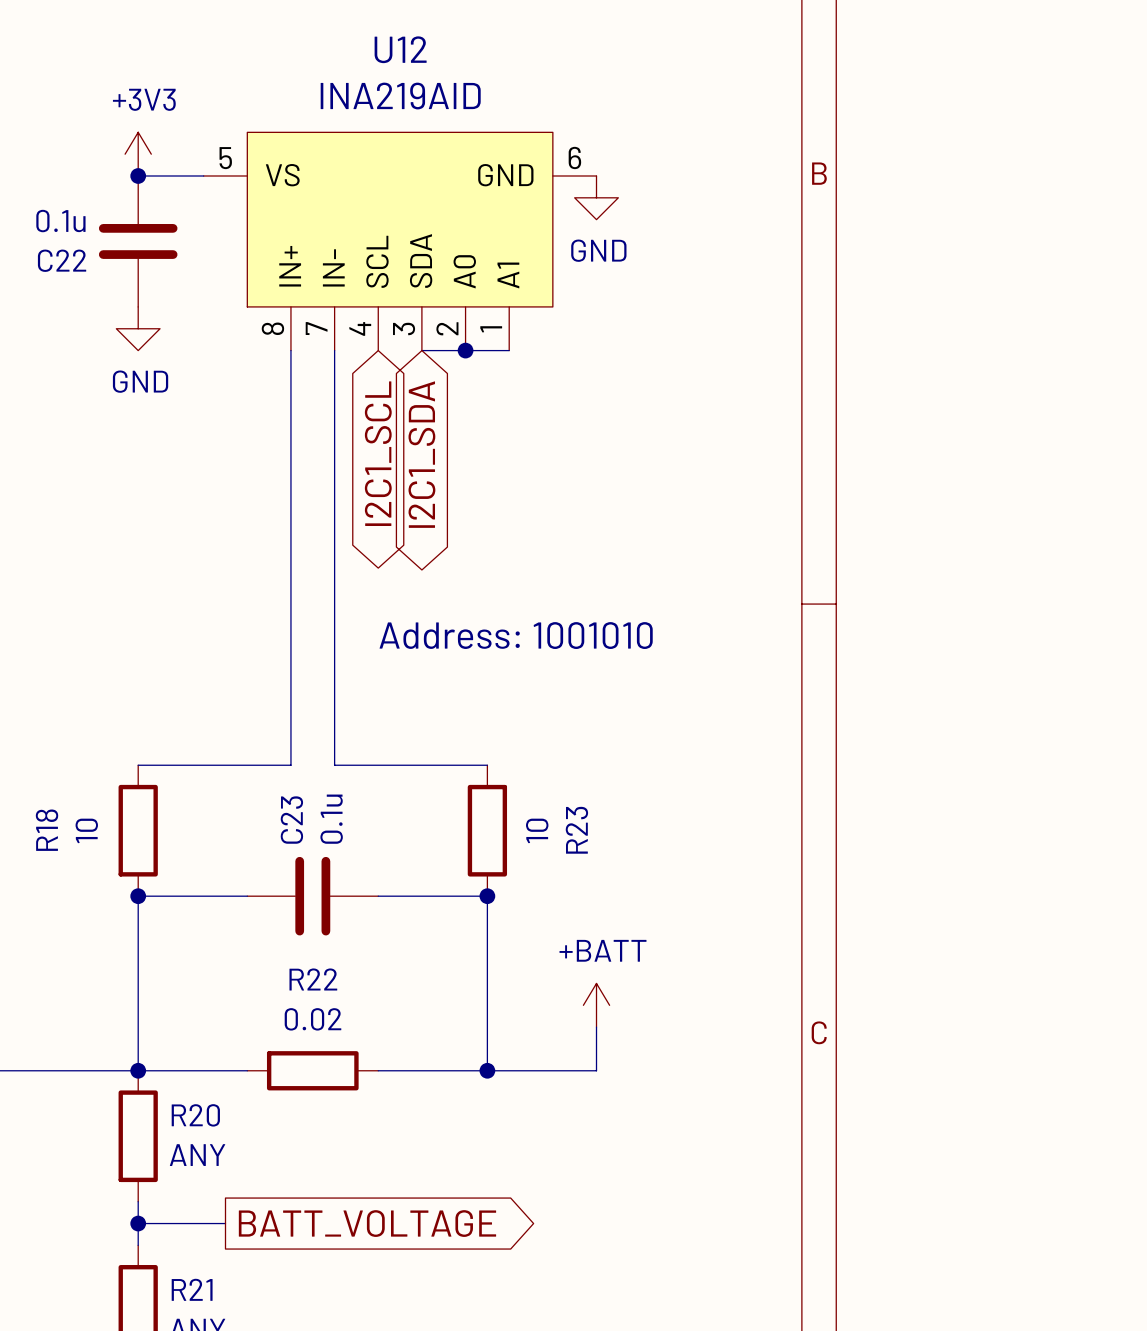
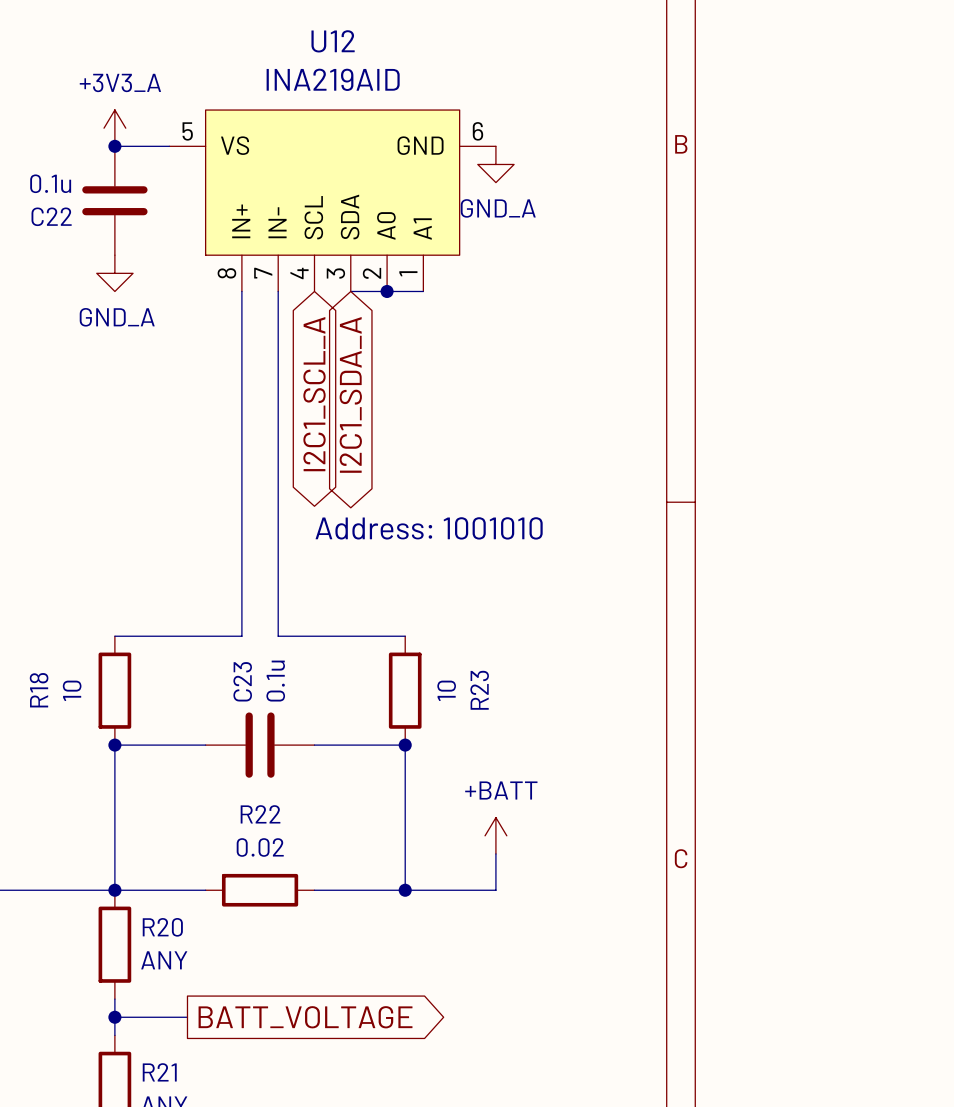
power symbol: +3V3 (138, 154) -> +3V3_A (114, 128)
power symbol: GND (596, 197) -> GND_A (495, 164)
power symbol: GND (138, 328) -> GND_A (114, 273)
global label: I2C1_SCL (378, 453) -> I2C1_SCL_A (314, 394)
global label: I2C1_SDA (421, 454) -> I2C1_SDA_A (350, 394)

